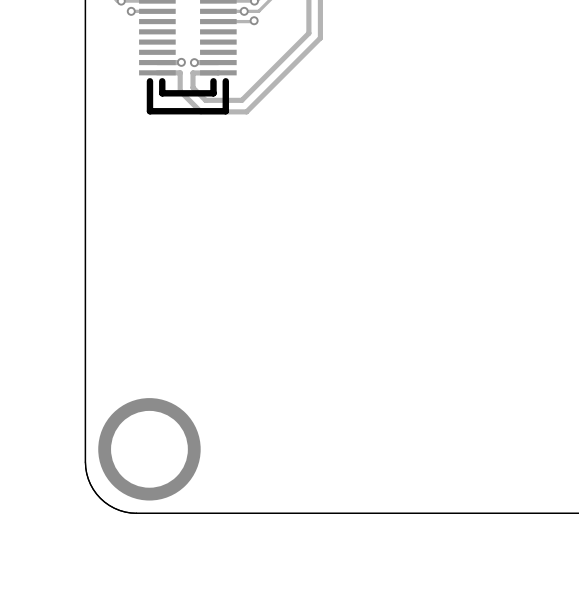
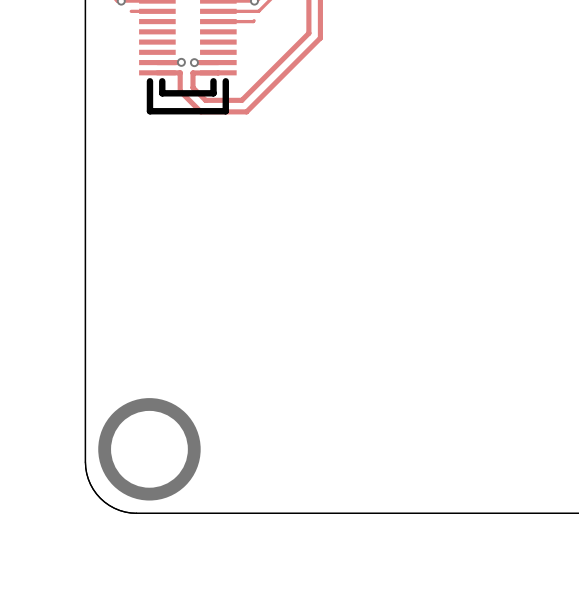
via: (131, 11) -> none
via: (244, 11) -> none
via: (254, 20) -> none

